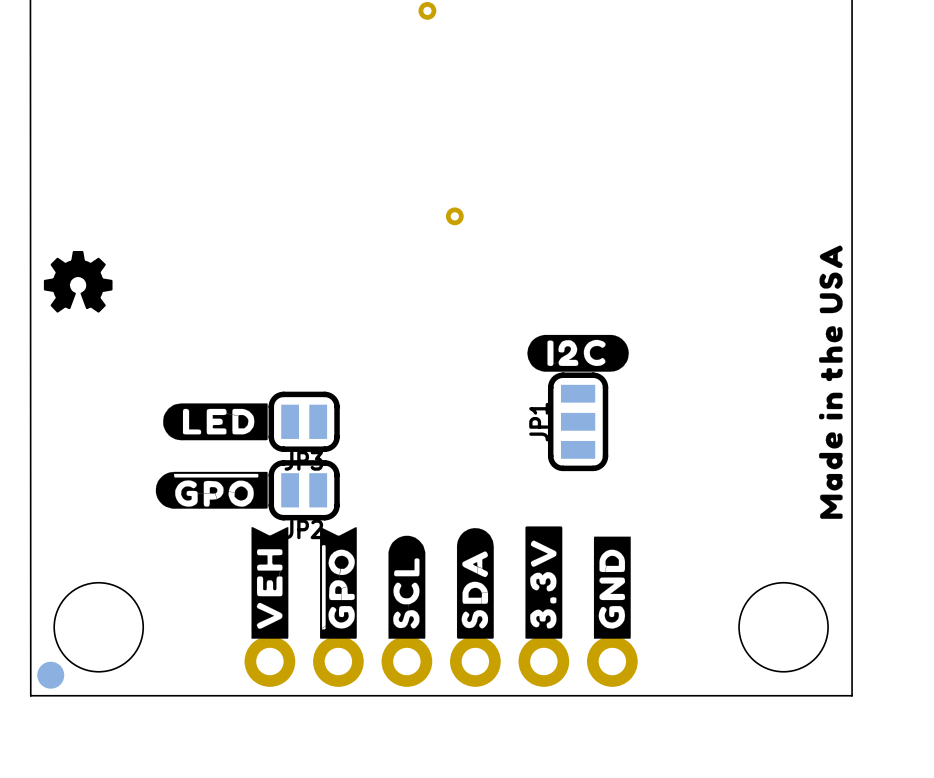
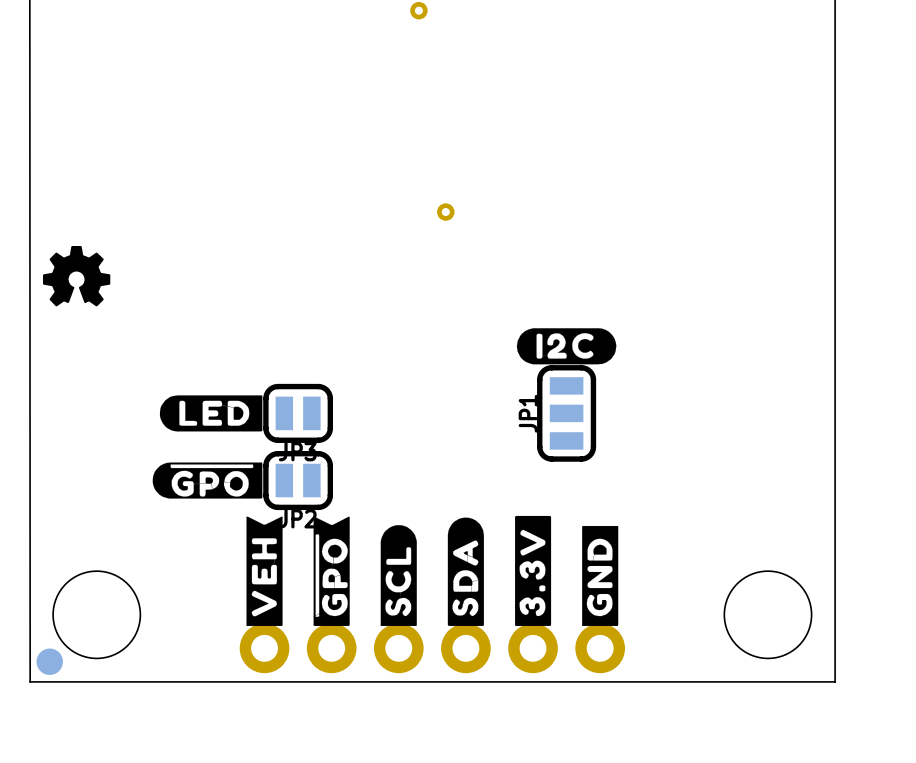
drawing: [819, 245, 843, 519] -> none

